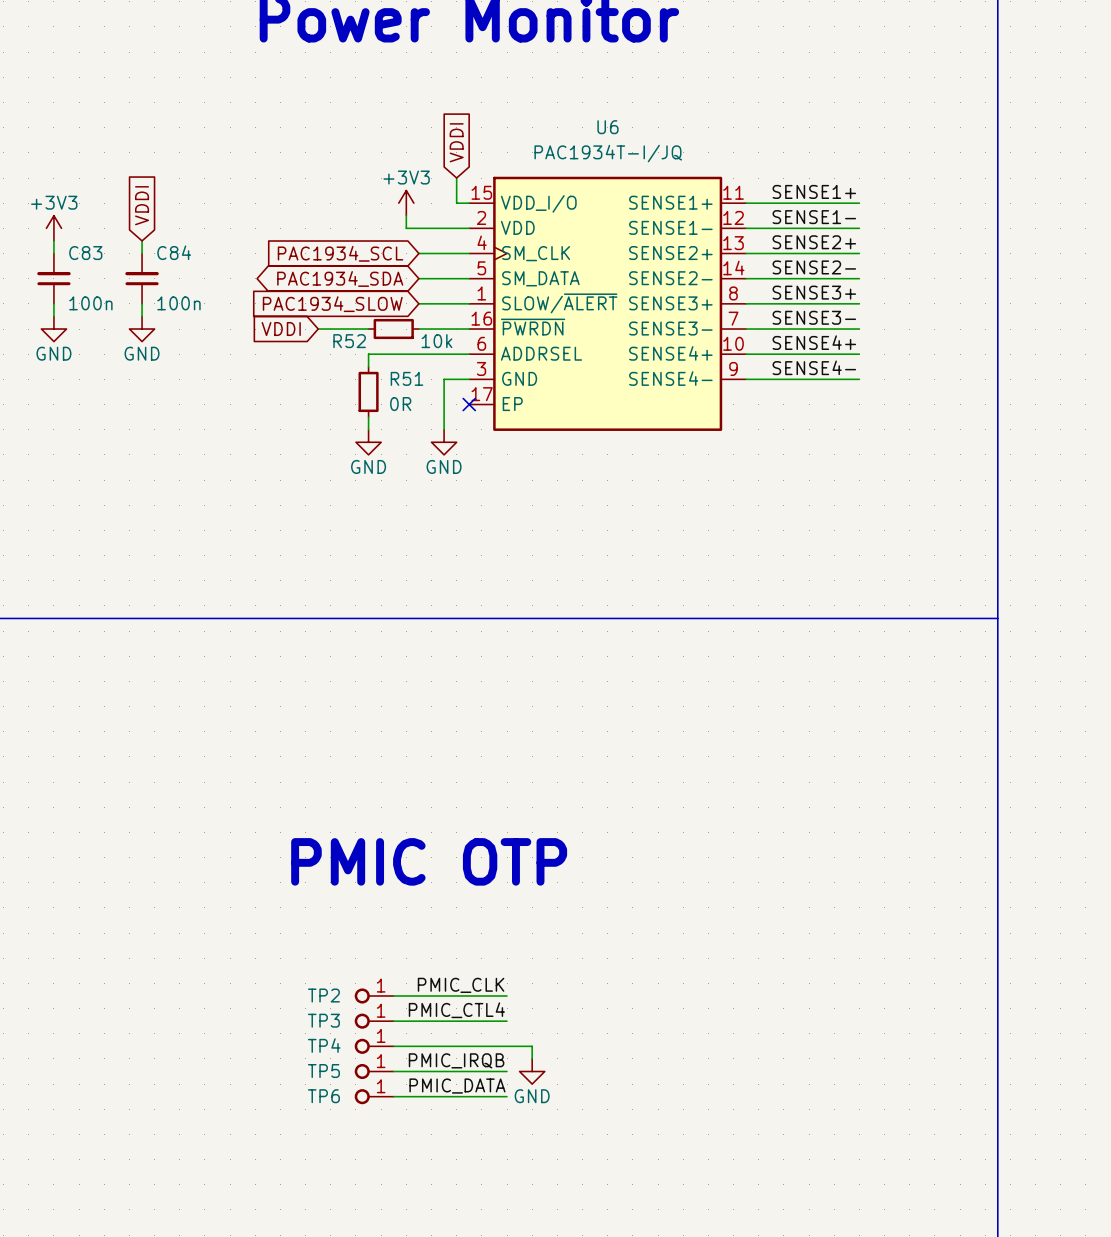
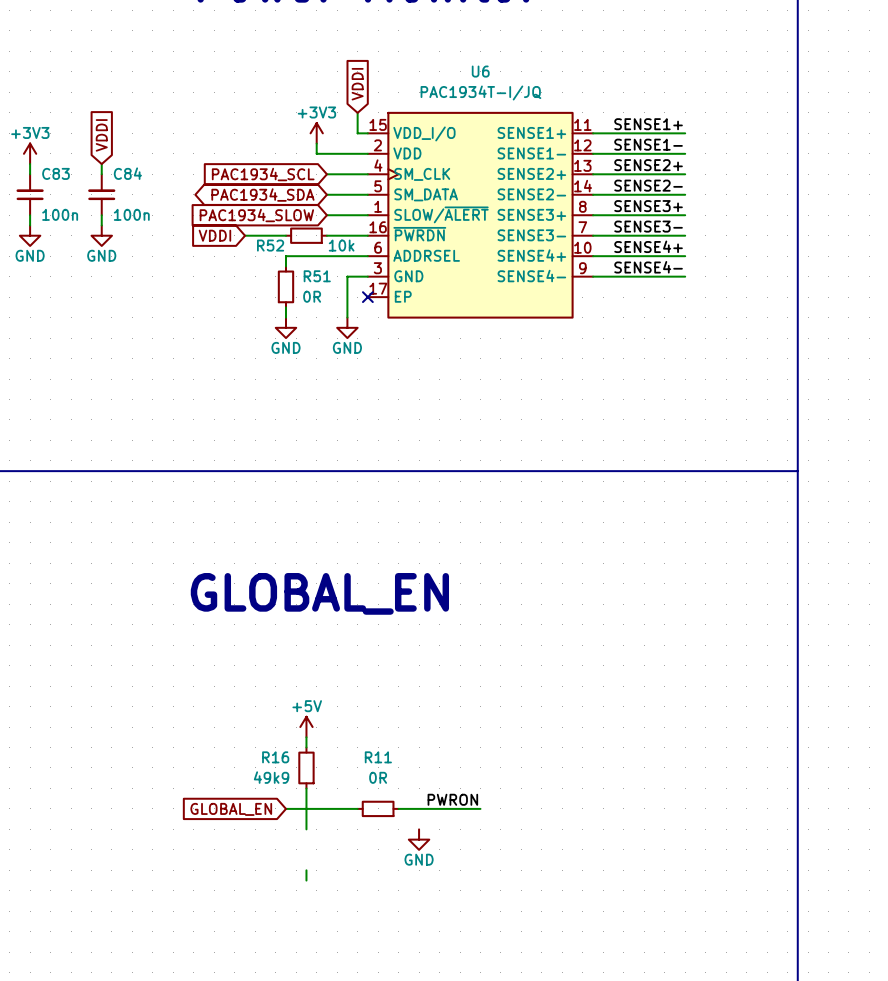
text: none -> GLOBAL_EN (319, 593)
text: PMIC OTP (429, 861) -> none
power symbol: none -> +5V (306, 727)
wire: none -> (306, 737) (306, 747)
R16: none -> (306, 767)
label: PMIC_CLK (461, 985) -> none
TP2: (374, 995) -> none
wire: (393, 995) (507, 995) -> none
wire: none -> (306, 788) (306, 829)
label: PMIC_CTL4 (456, 1010) -> none
TP3: (374, 1021) -> none
wire: (393, 1021) (507, 1021) -> none
label: none -> PWRON (452, 799)
wire: none -> (285, 808) (357, 808)
R11: none -> (378, 808)
wire: none -> (398, 808) (480, 808)
global label: none -> GLOBAL_EN (231, 809)
TP4: (374, 1046) -> none
wire: (393, 1046) (532, 1046) (532, 1058) -> none
label: PMIC_IRQB (456, 1060) -> none
TP5: (374, 1071) -> none
wire: (393, 1071) (507, 1071) -> none
label: PMIC_DATA (457, 1086) -> none
TP6: (374, 1096) -> none
wire: (393, 1096) (507, 1096) -> none
wire: none -> (306, 870) (306, 880)

